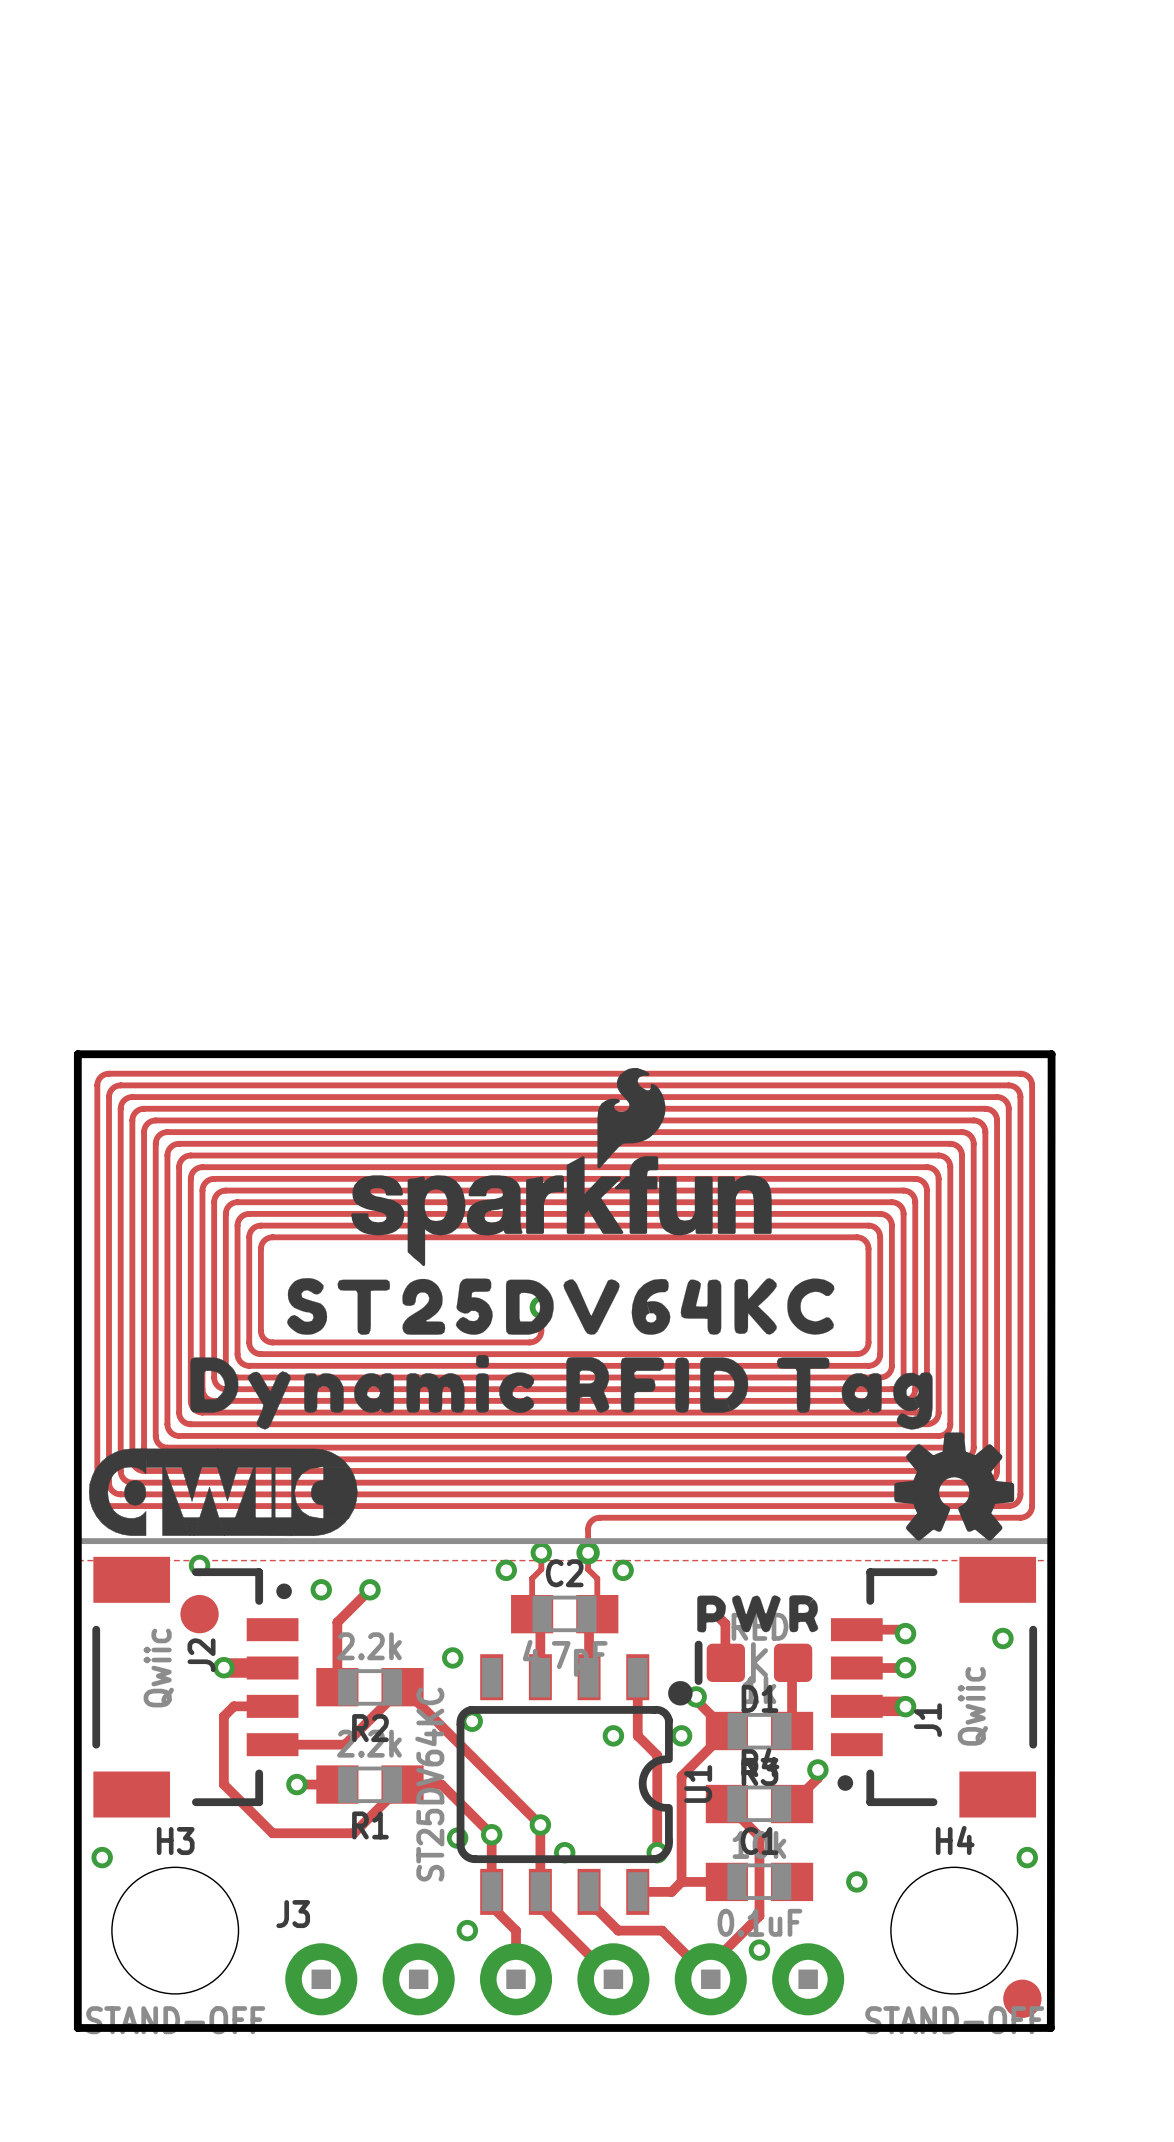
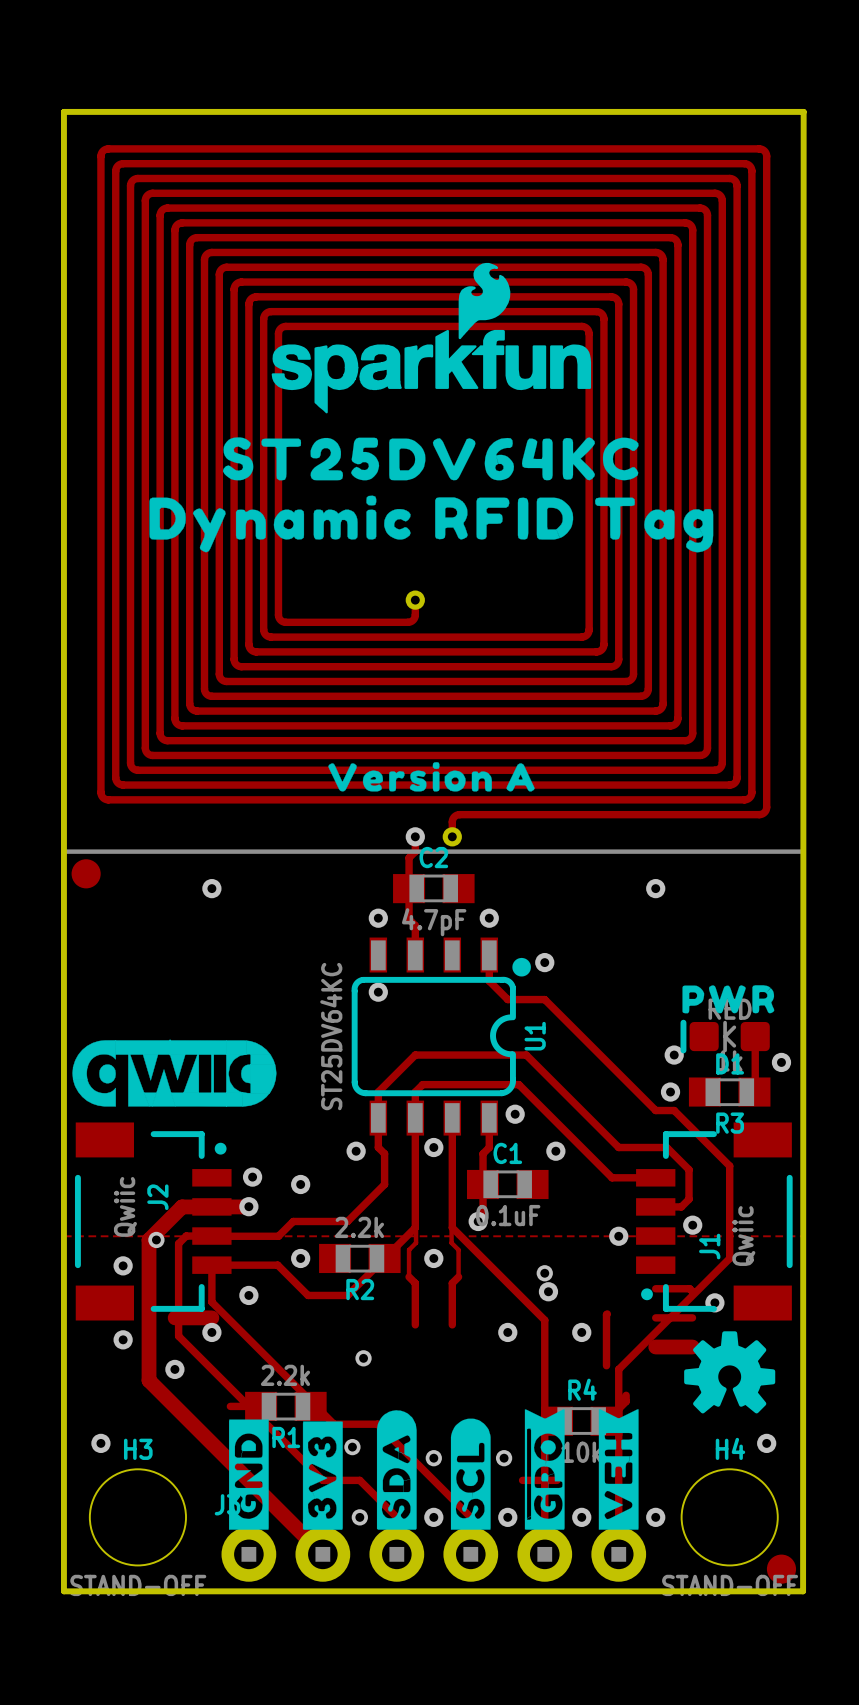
part: none -> (433, 481)
drawing: none -> [328, 762, 535, 792]
track: none -> (415, 836) (415, 851) (409, 857) (409, 919) (415, 925) (415, 955)
via: none -> (415, 836)
board edge: (77, 1054) (1051, 1054) -> (63, 851) (63, 111) (803, 111) (803, 851)
via: none -> (211, 888)
via: none -> (655, 888)
via: none -> (378, 918)
via: none -> (489, 918)
drawing position: (561, 1167) -> (431, 338)
track: none -> (489, 955) (489, 981) (507, 999) (544, 999) (655, 1110) (674, 1110) (729, 1166) (729, 1258) (618, 1369) (618, 1554)
via: none -> (544, 962)
via: none -> (378, 992)
track: none -> (755, 1036) (754, 1092)
drawing position: (560, 1306) -> (430, 458)
part: (564, 1307) -> none
via: none -> (674, 1055)
via: none -> (781, 1062)
via: none -> (670, 1092)
drawing position: (561, 1392) -> (431, 524)
via: none -> (515, 1114)
track: none -> (489, 1118) (489, 1147) (483, 1153) (483, 1216) (478, 1221)
via: none -> (433, 1147)
via: none -> (356, 1151)
via: none -> (555, 1151)
via: none -> (252, 1177)
drawing position: (954, 1486) -> (729, 1372)
drawing position: (223, 1492) -> (174, 1073)
via: none -> (300, 1184)
via: none -> (248, 1206)
track: none -> (655, 1206) (681, 1206) (689, 1199) (689, 1169) (666, 1147) (618, 1147) (526, 1055) (415, 1055) (378, 1092) (378, 1147) (384, 1153) (384, 1184) (347, 1221) (293, 1221) (278, 1236) (212, 1236)
via: none -> (478, 1221)
via: none -> (692, 1225)
via: (541, 1552) -> none
track: none -> (211, 1236) (186, 1236) (178, 1243) (178, 1336) (322, 1480) (359, 1480) (378, 1498)
via: none -> (618, 1236)
via: (506, 1570) -> none
via: (623, 1570) -> none
via: (321, 1589) -> none
track: (369, 1589) (337, 1622) (337, 1687) -> none
via position: (369, 1589) -> (300, 1258)
via: none -> (433, 1258)
via: none -> (123, 1265)
track: (710, 1609) (725, 1623) (725, 1662) -> none
drawing position: (757, 1613) -> (728, 999)
part position: (199, 1614) -> (86, 873)
C2 position: (564, 1614) -> (433, 888)
via: none -> (548, 1291)
via: (905, 1633) -> none
via: none -> (248, 1295)
via: (1002, 1638) -> none
via: none -> (714, 1302)
via: (452, 1657) -> none
D1 position: (753, 1662) -> (725, 1036)
via: (223, 1667) -> none
via: (905, 1667) -> none
track: (637, 1677) (637, 1735) (657, 1755) (657, 1852) -> none
J2 position: (195, 1687) -> (153, 1221)
via: none -> (211, 1332)
R2 position: (369, 1687) -> (359, 1258)
via: none -> (507, 1332)
via: none -> (581, 1332)
J1 position: (934, 1687) -> (714, 1221)
via: none -> (123, 1339)
track: (696, 1696) (696, 1700) (726, 1730) (681, 1776) (681, 1881) (671, 1891) (637, 1891) -> none
via: (696, 1696) -> none
track: (272, 1706) (233, 1706) (223, 1716) (223, 1784) -> (248, 1206) (182, 1206) (149, 1239) (149, 1380) (174, 1406)
via: (905, 1706) -> none
R3 position: (759, 1730) -> (729, 1092)
via: none -> (174, 1369)
via: (613, 1735) -> none
via: (681, 1735) -> none
track: (272, 1744) (345, 1744) (402, 1687) (540, 1824) (540, 1906) (613, 1979) -> (655, 1177) (612, 1177) (518, 1084) (422, 1084) (415, 1092) (415, 1227) (347, 1295) (308, 1295) (277, 1265) (211, 1265) (211, 1302) (333, 1424) (377, 1424) (470, 1517) (470, 1554)
via: (817, 1769) -> none
track width: thin (223, 1784) (272, 1833) -> thick (174, 1406) (211, 1443)
via: (296, 1784) -> none
U1 position: (574, 1784) -> (441, 1036)
drawing: none -> [229, 1409, 639, 1530]
track: (726, 1804) (759, 1836) (759, 1916) (710, 1964) -> (452, 1118) (452, 1227) (544, 1320) (544, 1543)
via: (540, 1824) -> none
via: none -> (100, 1443)
track: (272, 1833) (353, 1833) (402, 1784) (441, 1784) (491, 1834) (491, 1906) -> (211, 1443) (322, 1554)
via: none -> (766, 1443)
via: (491, 1834) -> none
via: (102, 1857) -> none
via: (1027, 1857) -> none
C1 position: (759, 1881) -> (507, 1184)
via: (856, 1881) -> none
track: (589, 1891) (589, 1901) (618, 1930) (662, 1930) (710, 1979) -> none
via: none -> (433, 1517)
via: none -> (507, 1517)
via: none -> (655, 1517)
via position: (759, 1950) -> (581, 1517)

